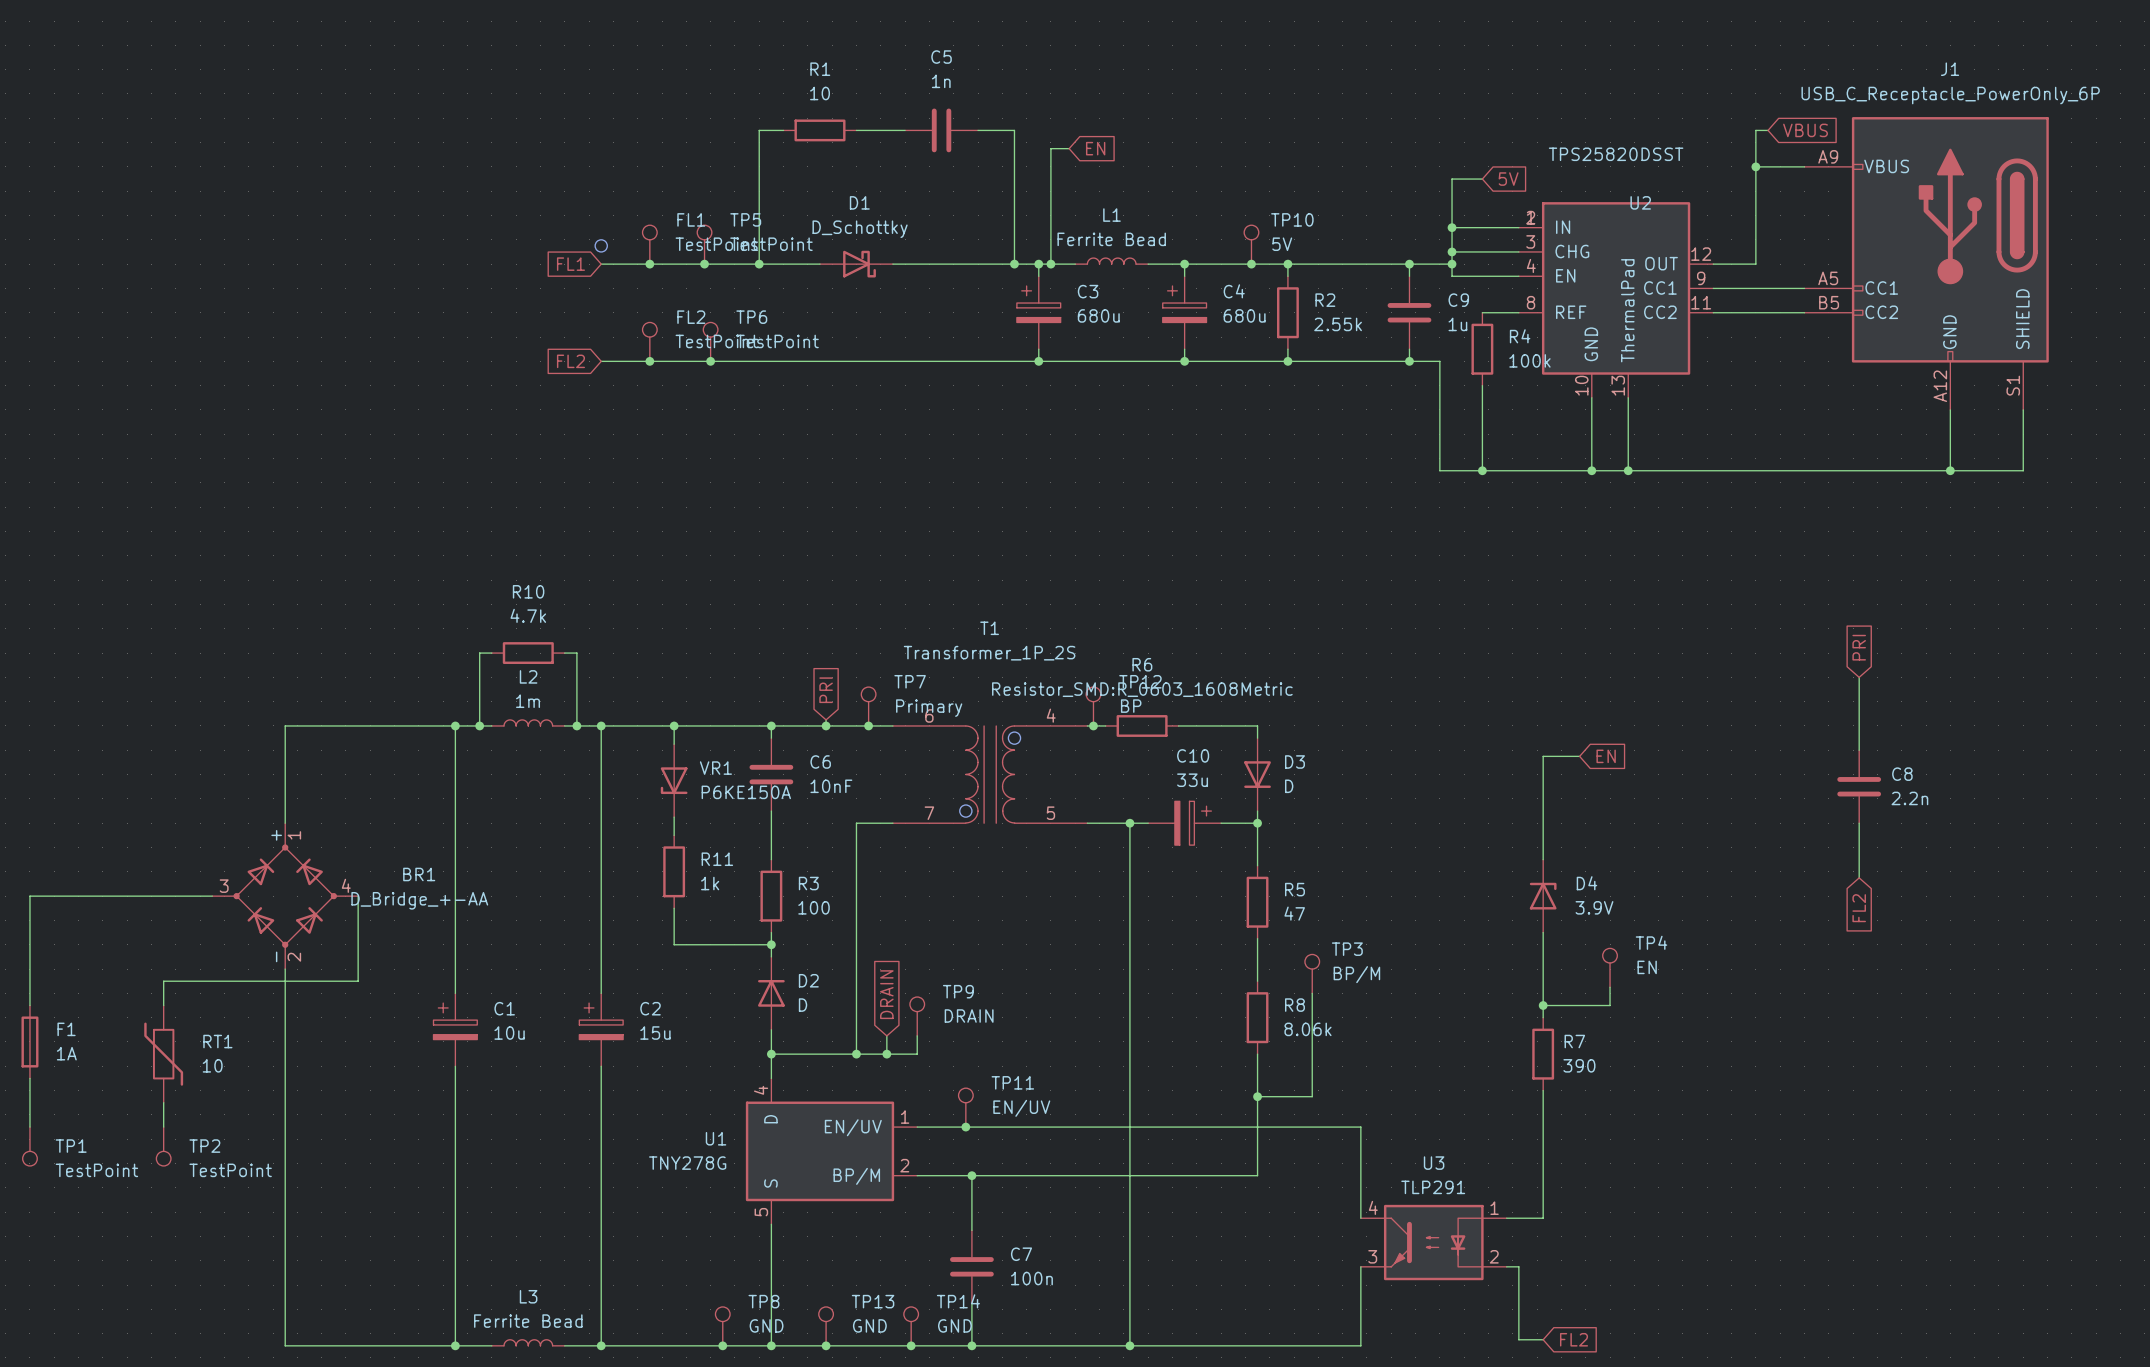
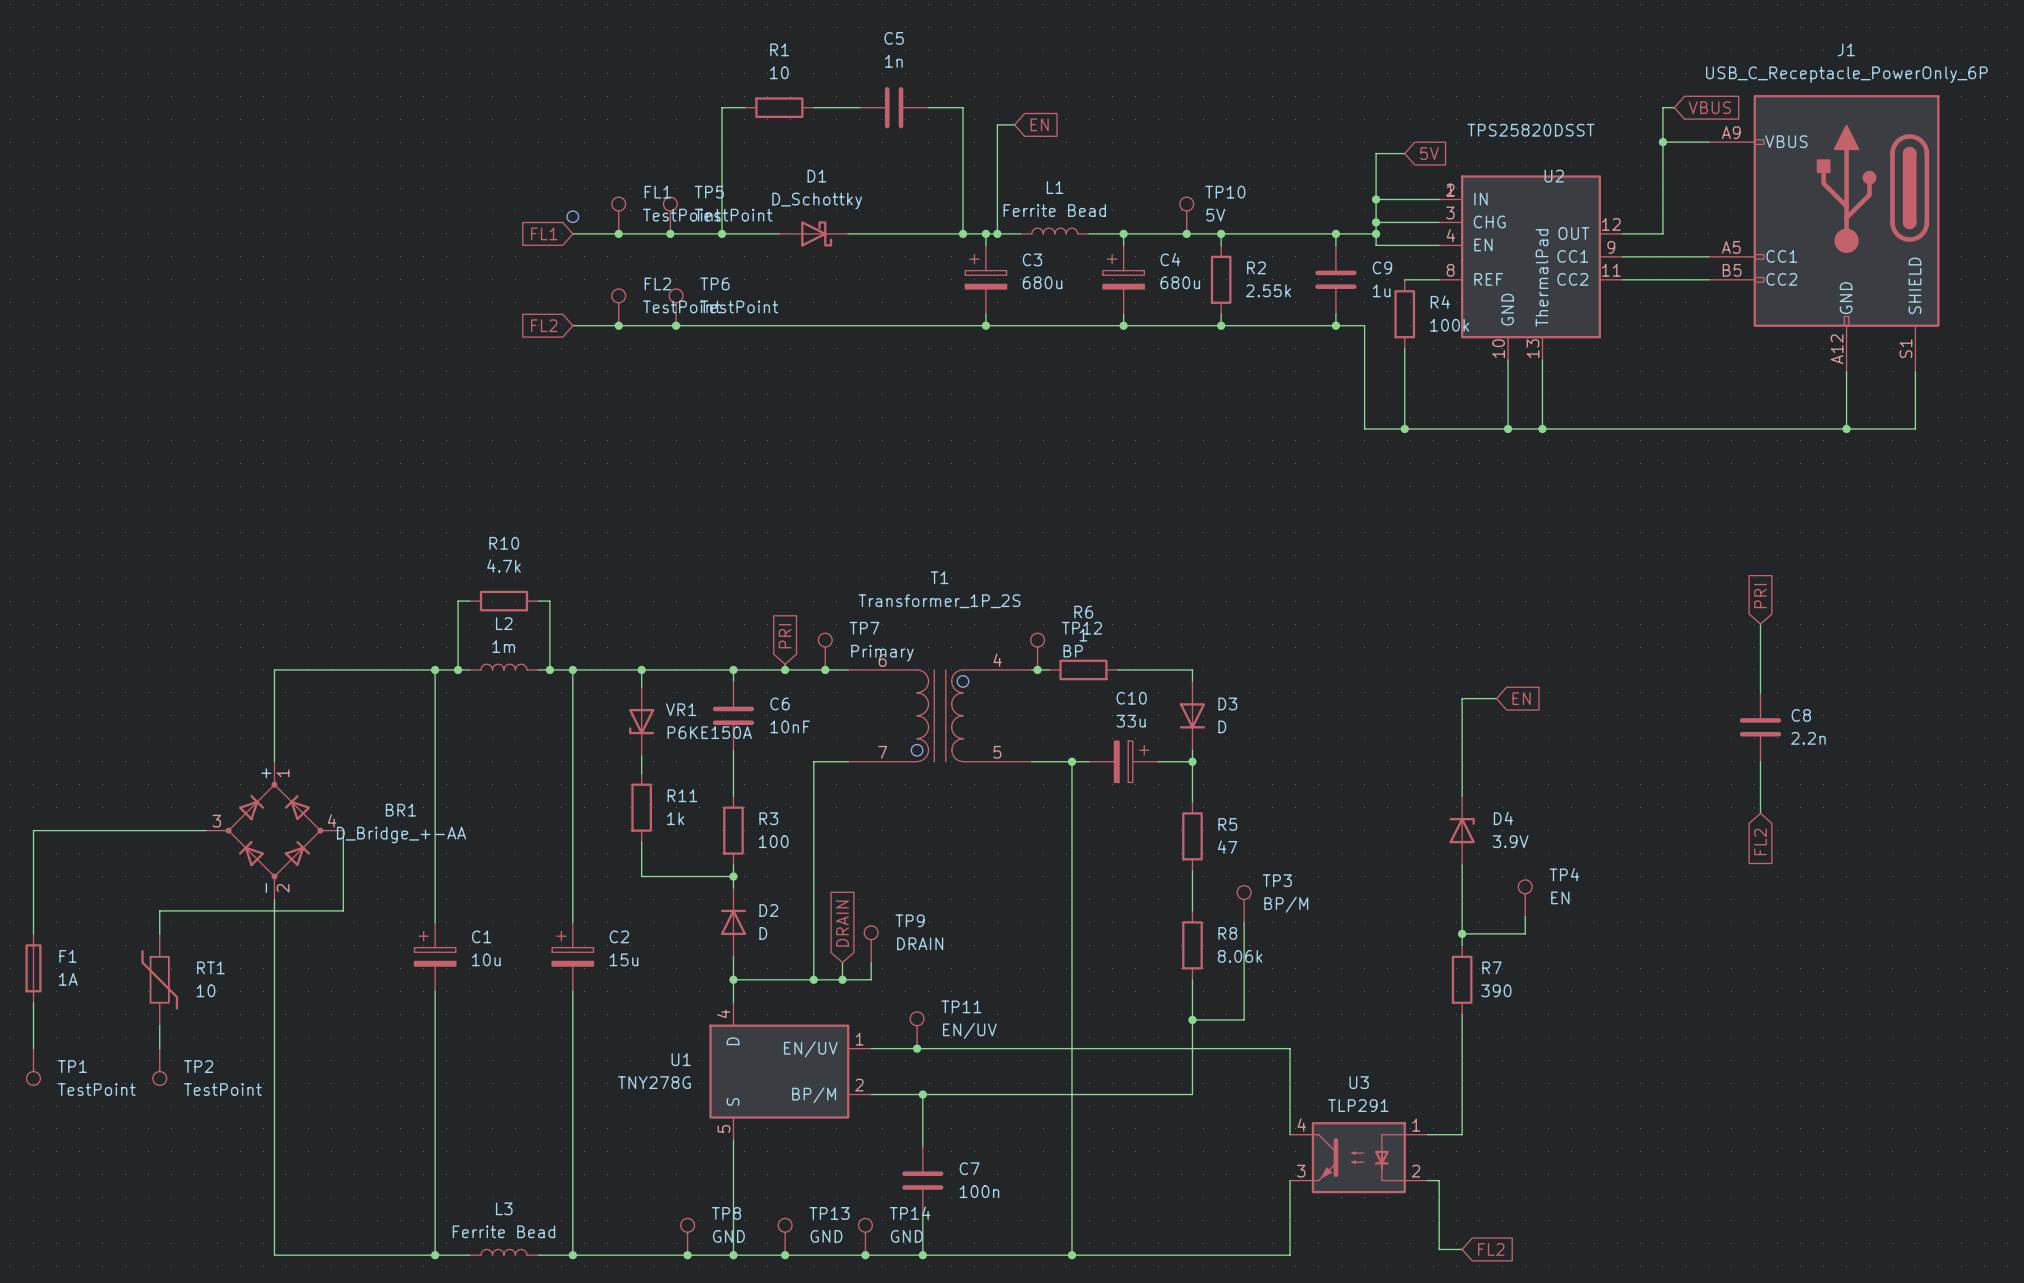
R6 value: Resistor_SMD:R_0603_1608Metric (1142, 689) -> 1 (1083, 635)

